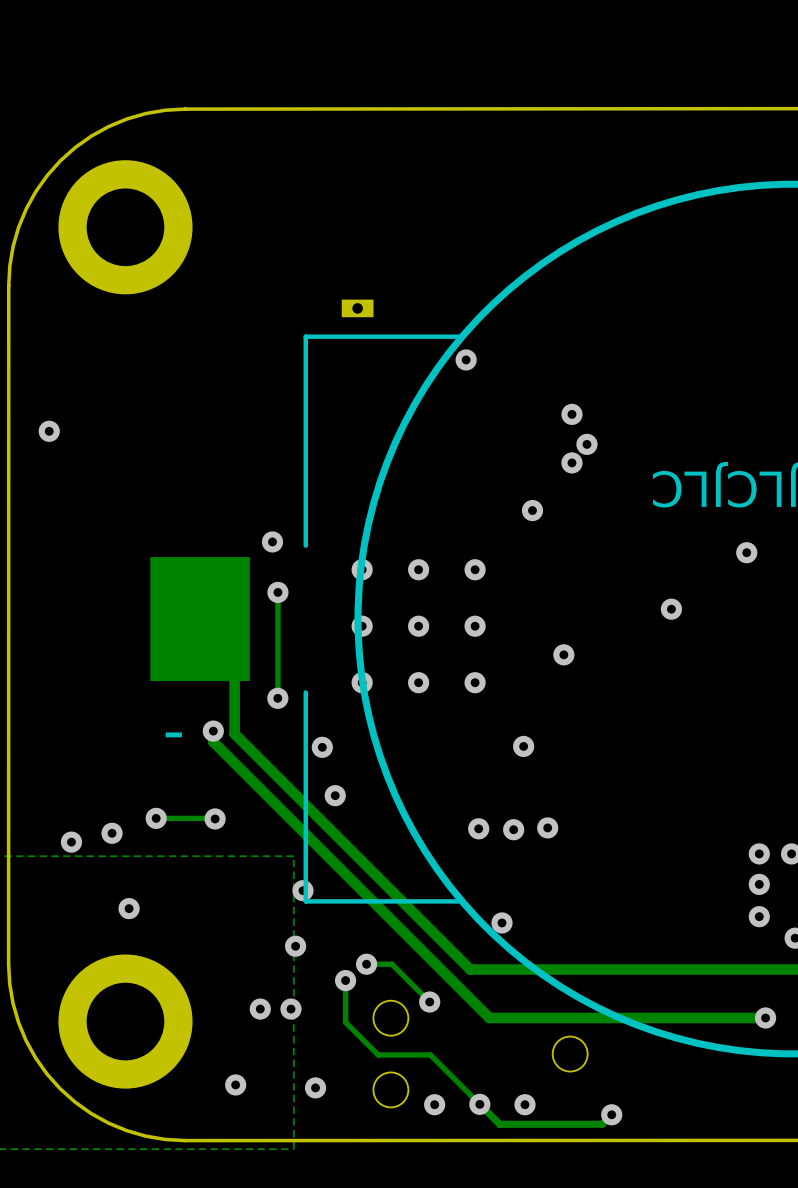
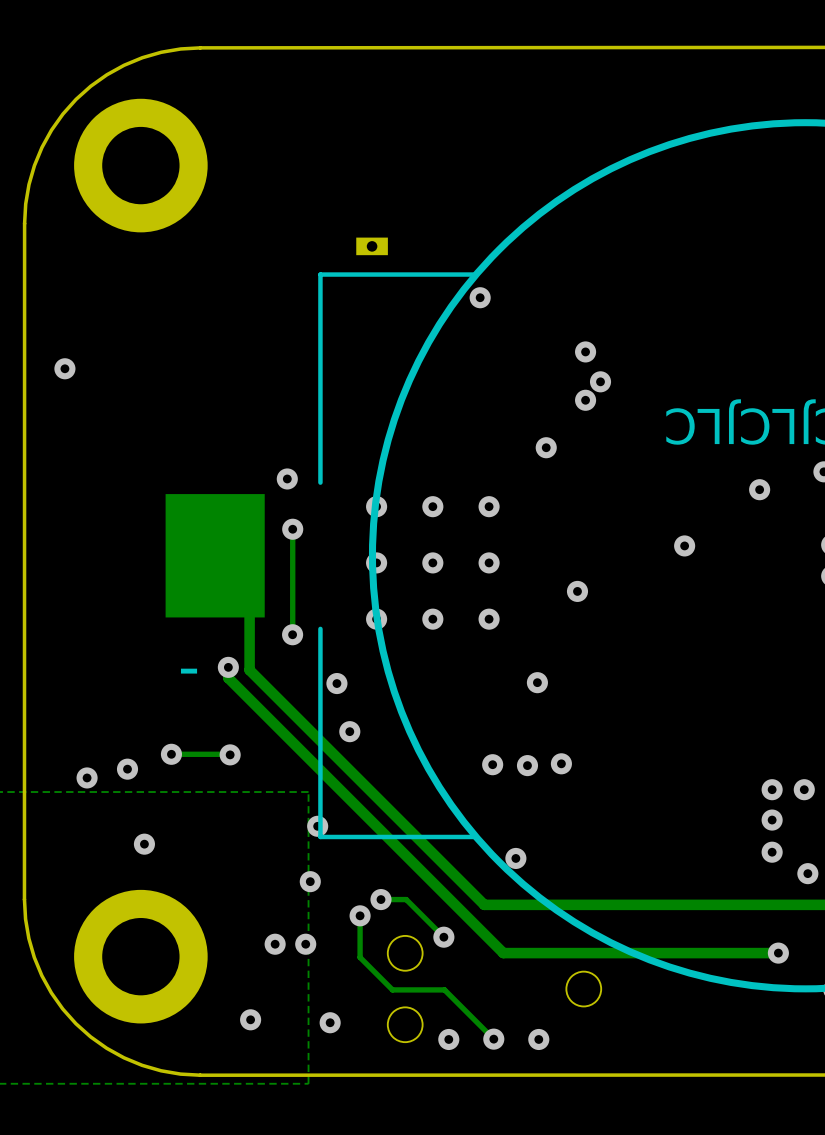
track: (479, 1104) (499, 1124) (602, 1124) (611, 1114) -> none
via: (611, 1114) -> none

